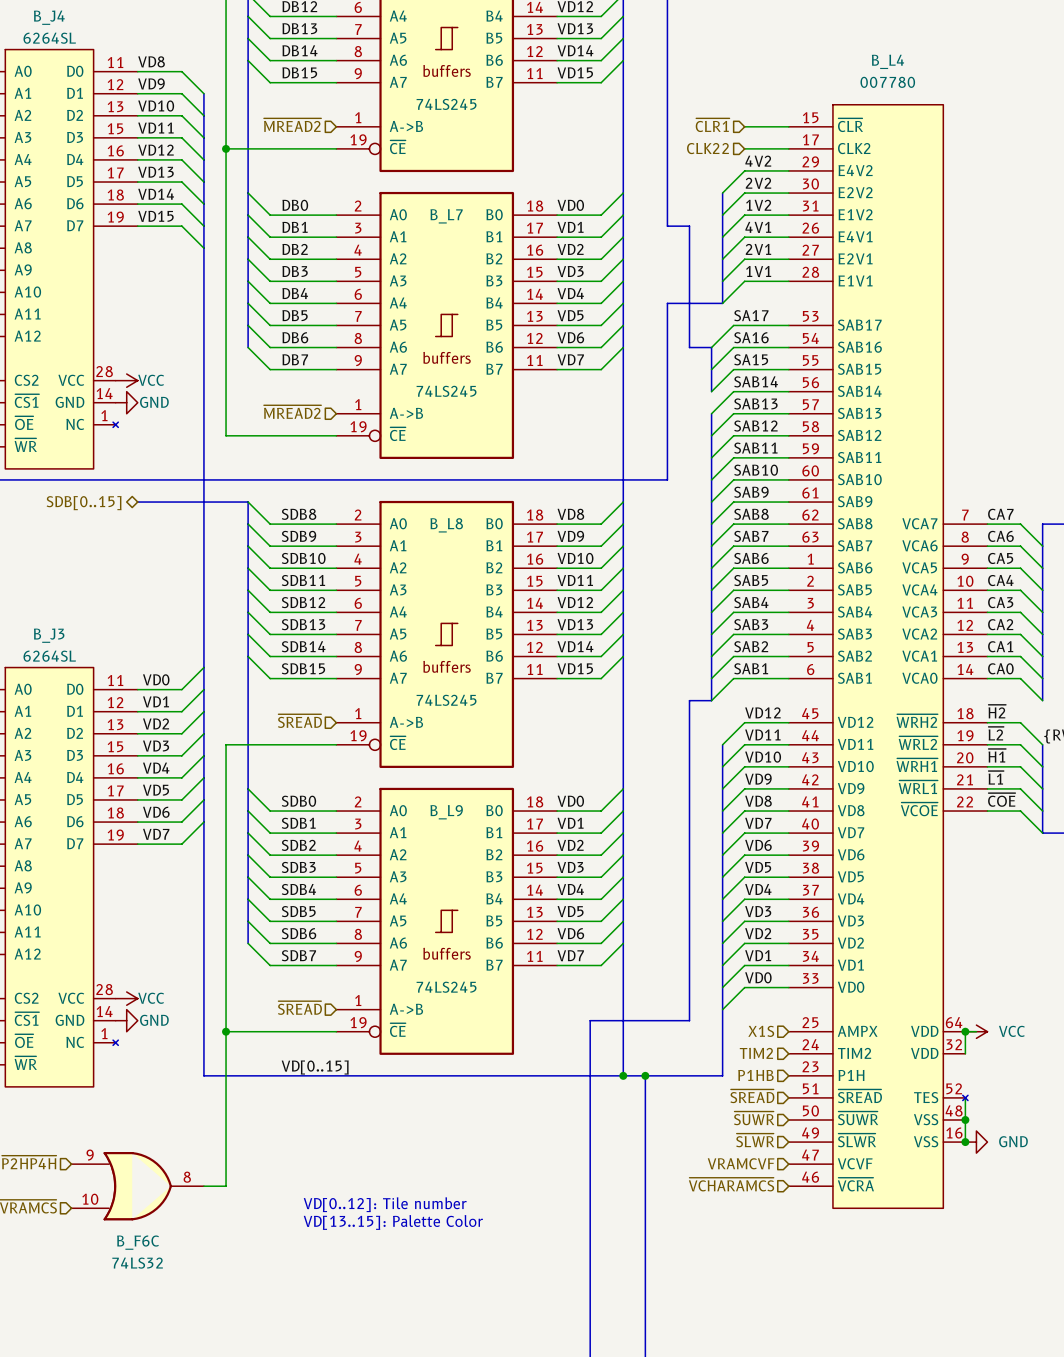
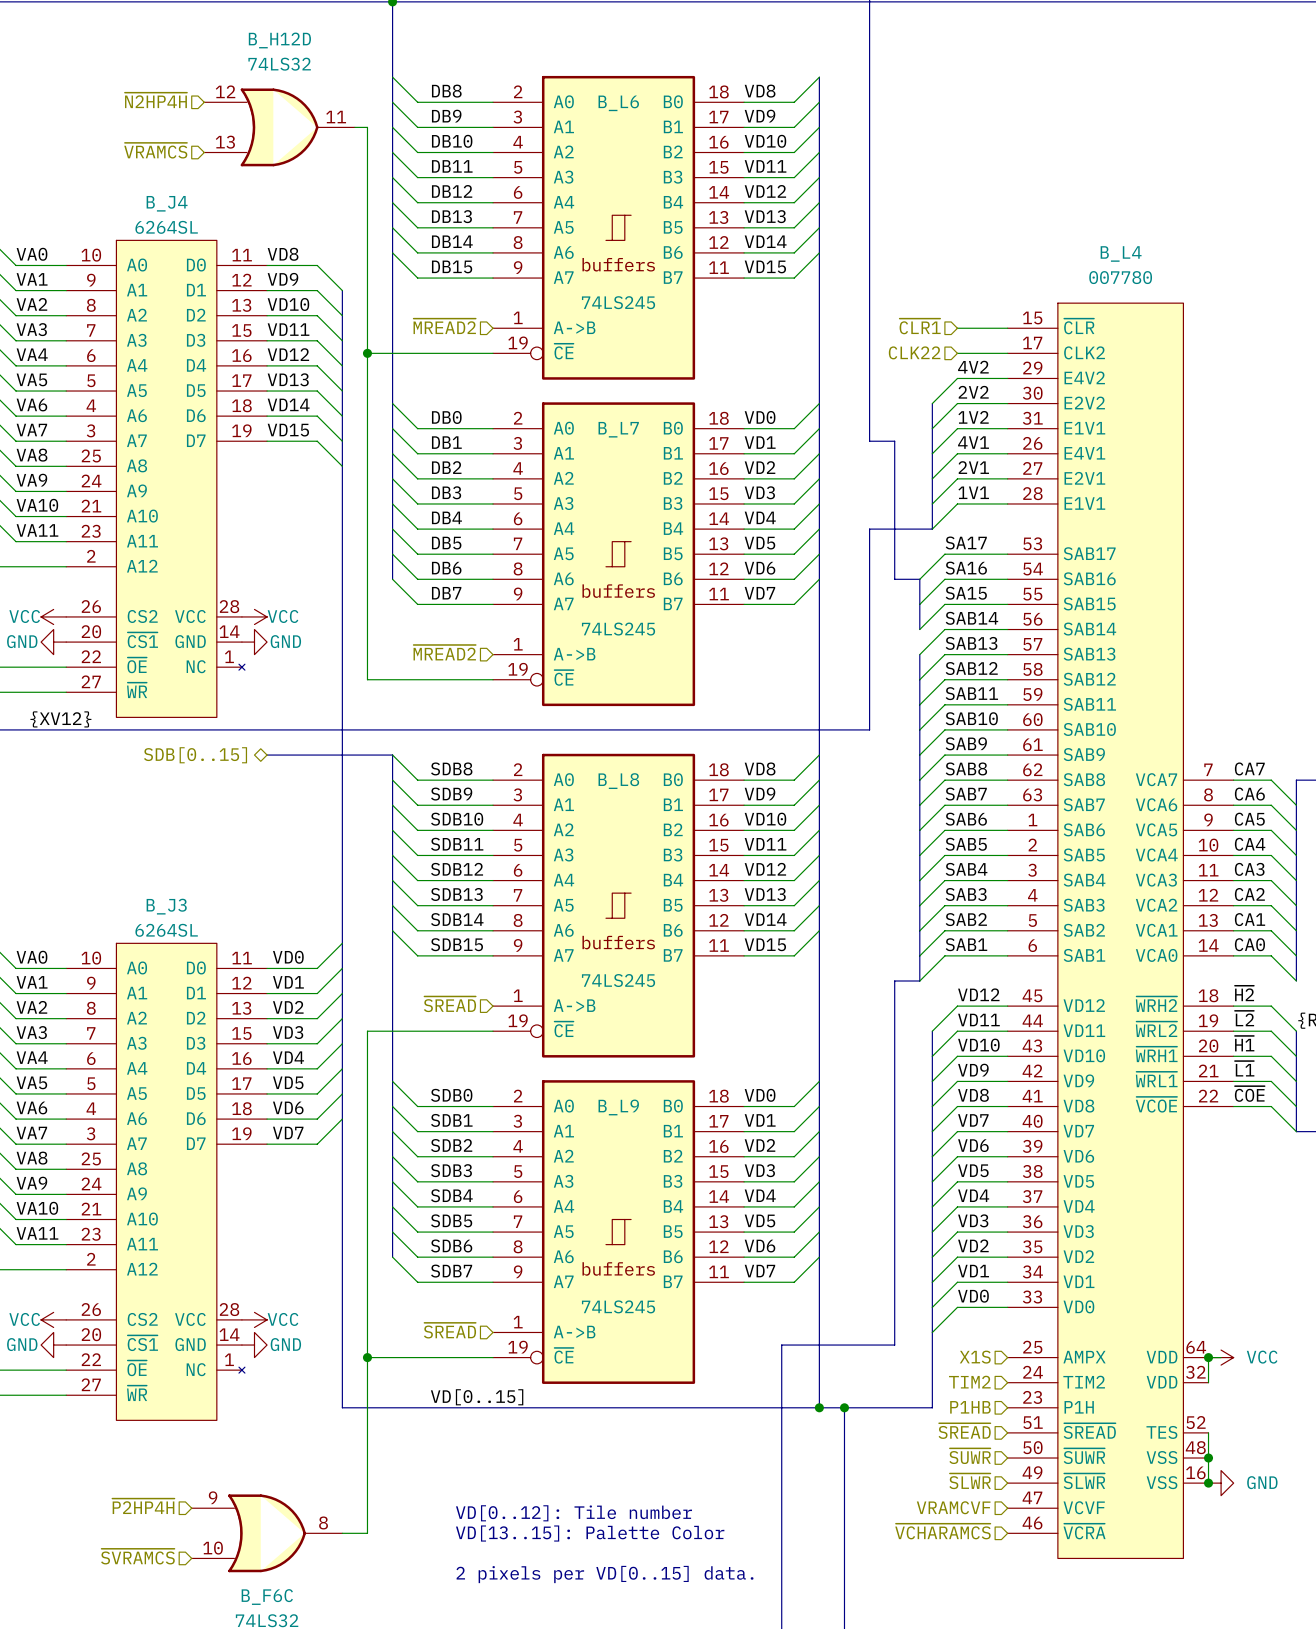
B_L4 symbol: [788, 104, 988, 1209] -> [1007, 303, 1234, 1559]
text: none -> VD[13..15]: Palette Color (590, 1533)
text position: VD[0..12]: Tile number (385, 1204) -> VD[0..12]: Tile number (574, 1513)
text: VD[13..15]: Palette Color (393, 1222) -> 2 pixels per VD[0..15] data. (604, 1574)

